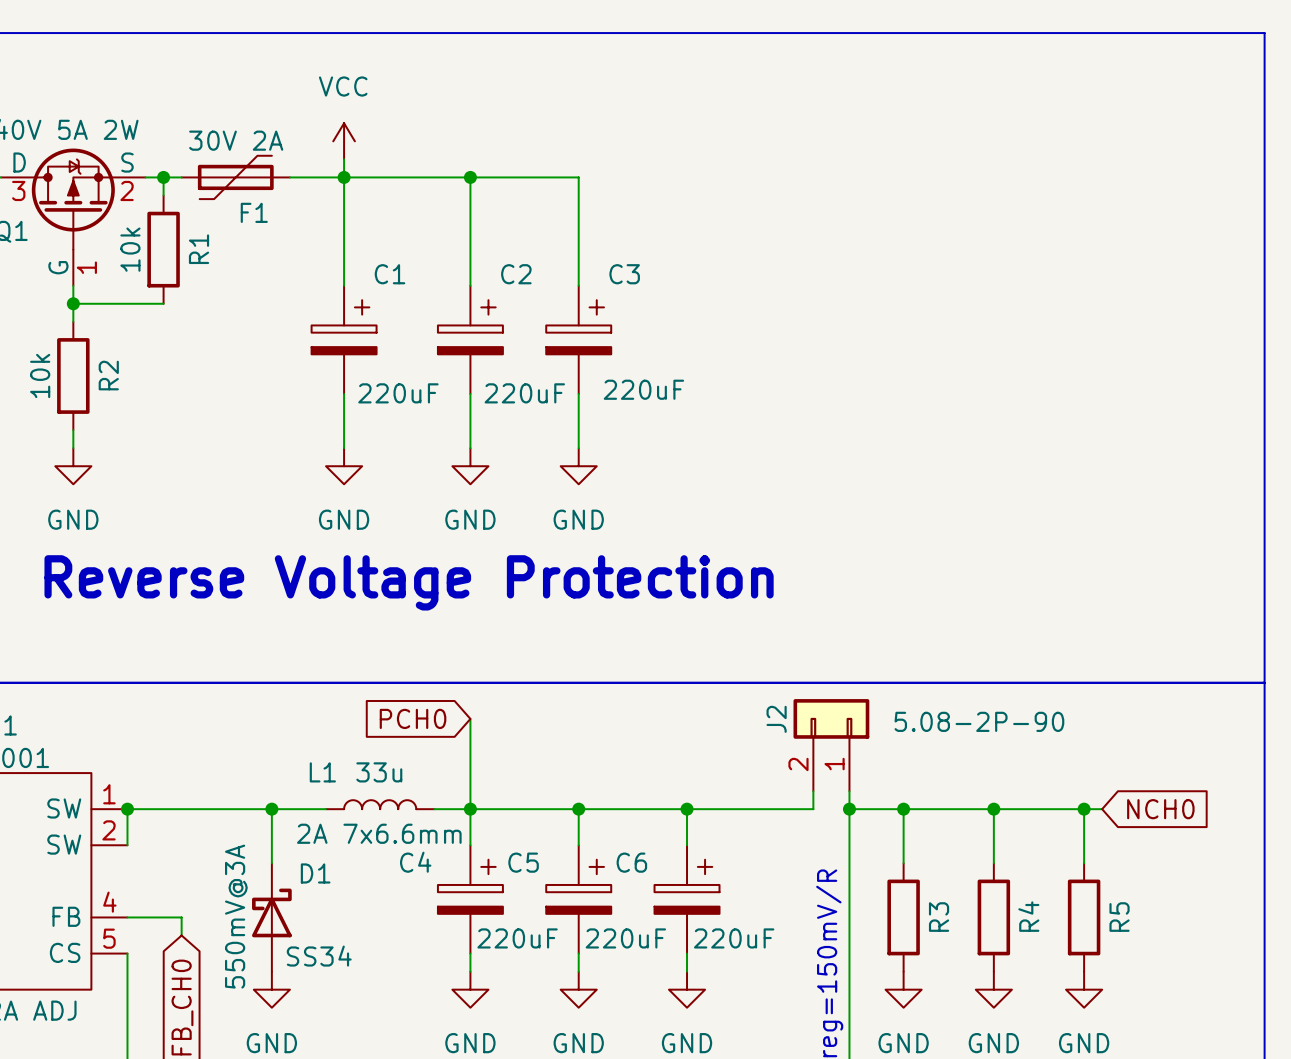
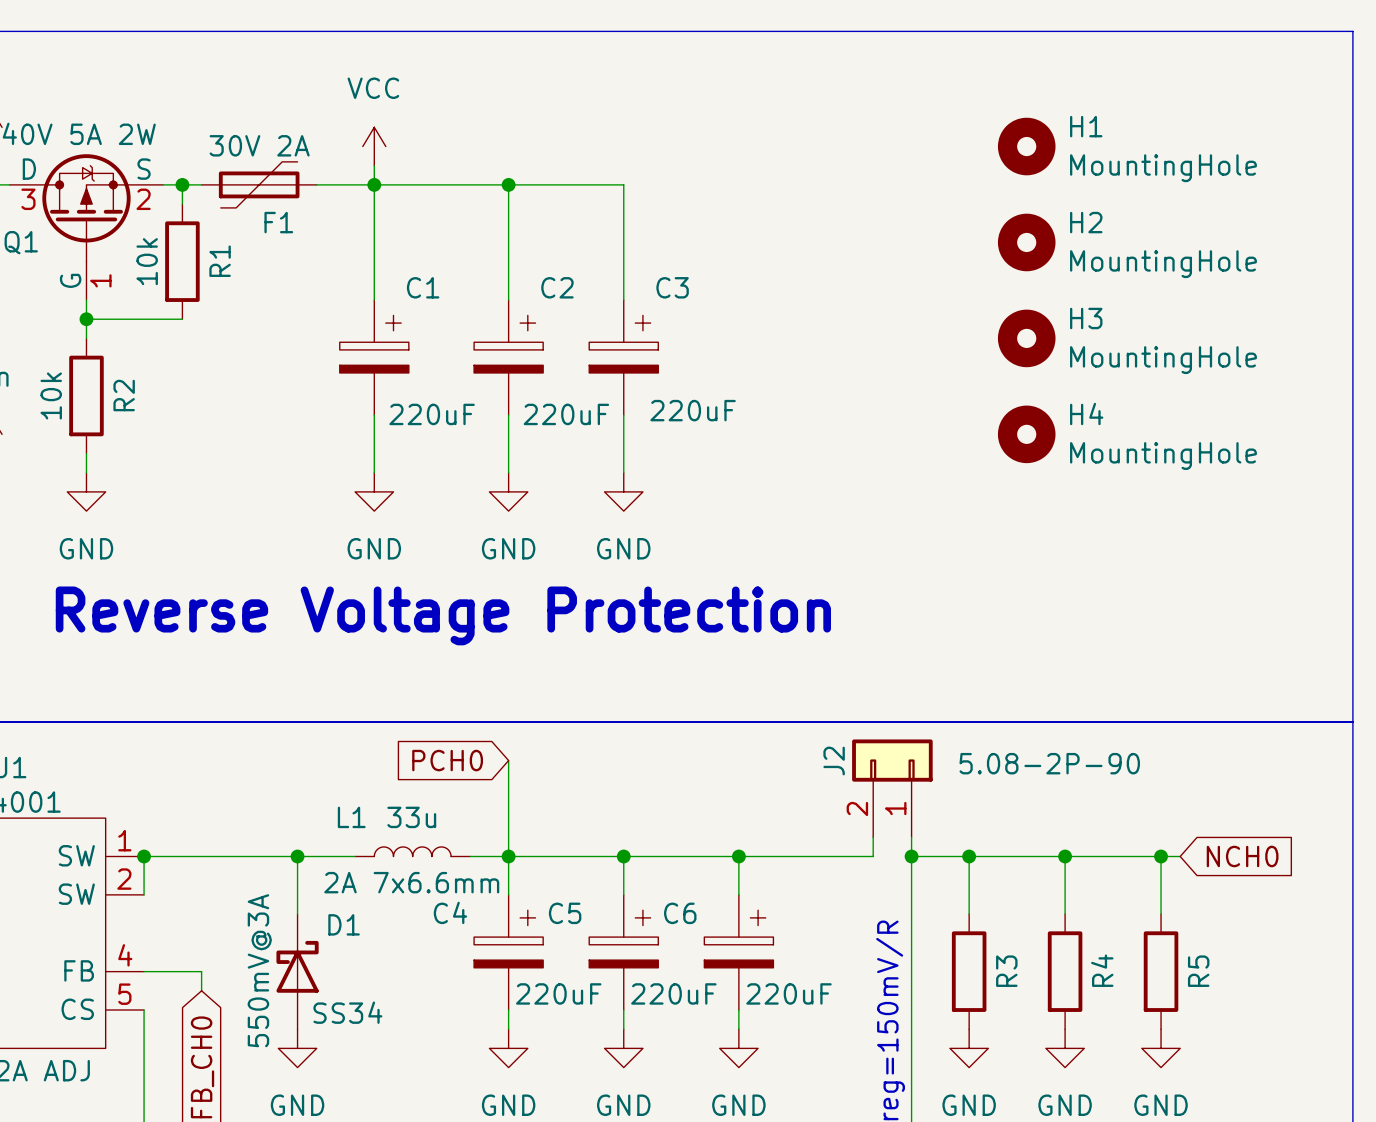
H1: none -> MountingHole (1026, 146)
H2: none -> MountingHole (1026, 242)
H3: none -> MountingHole (1026, 338)
H4: none -> MountingHole (1026, 434)

